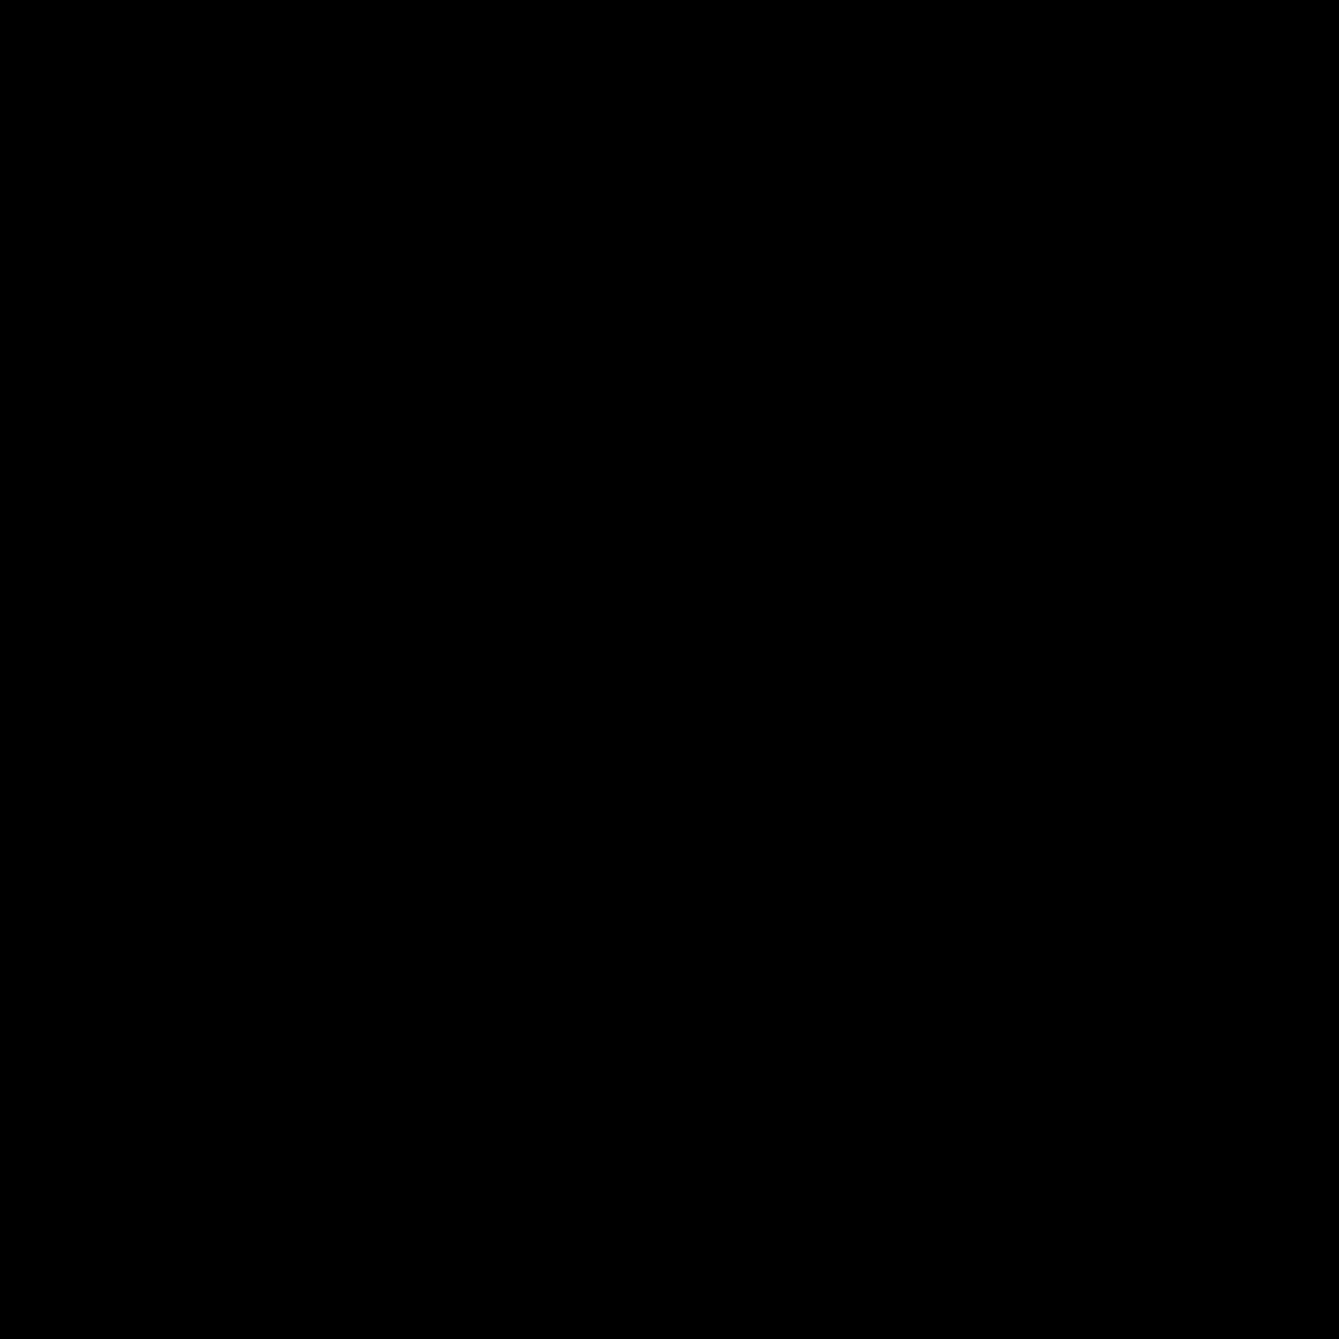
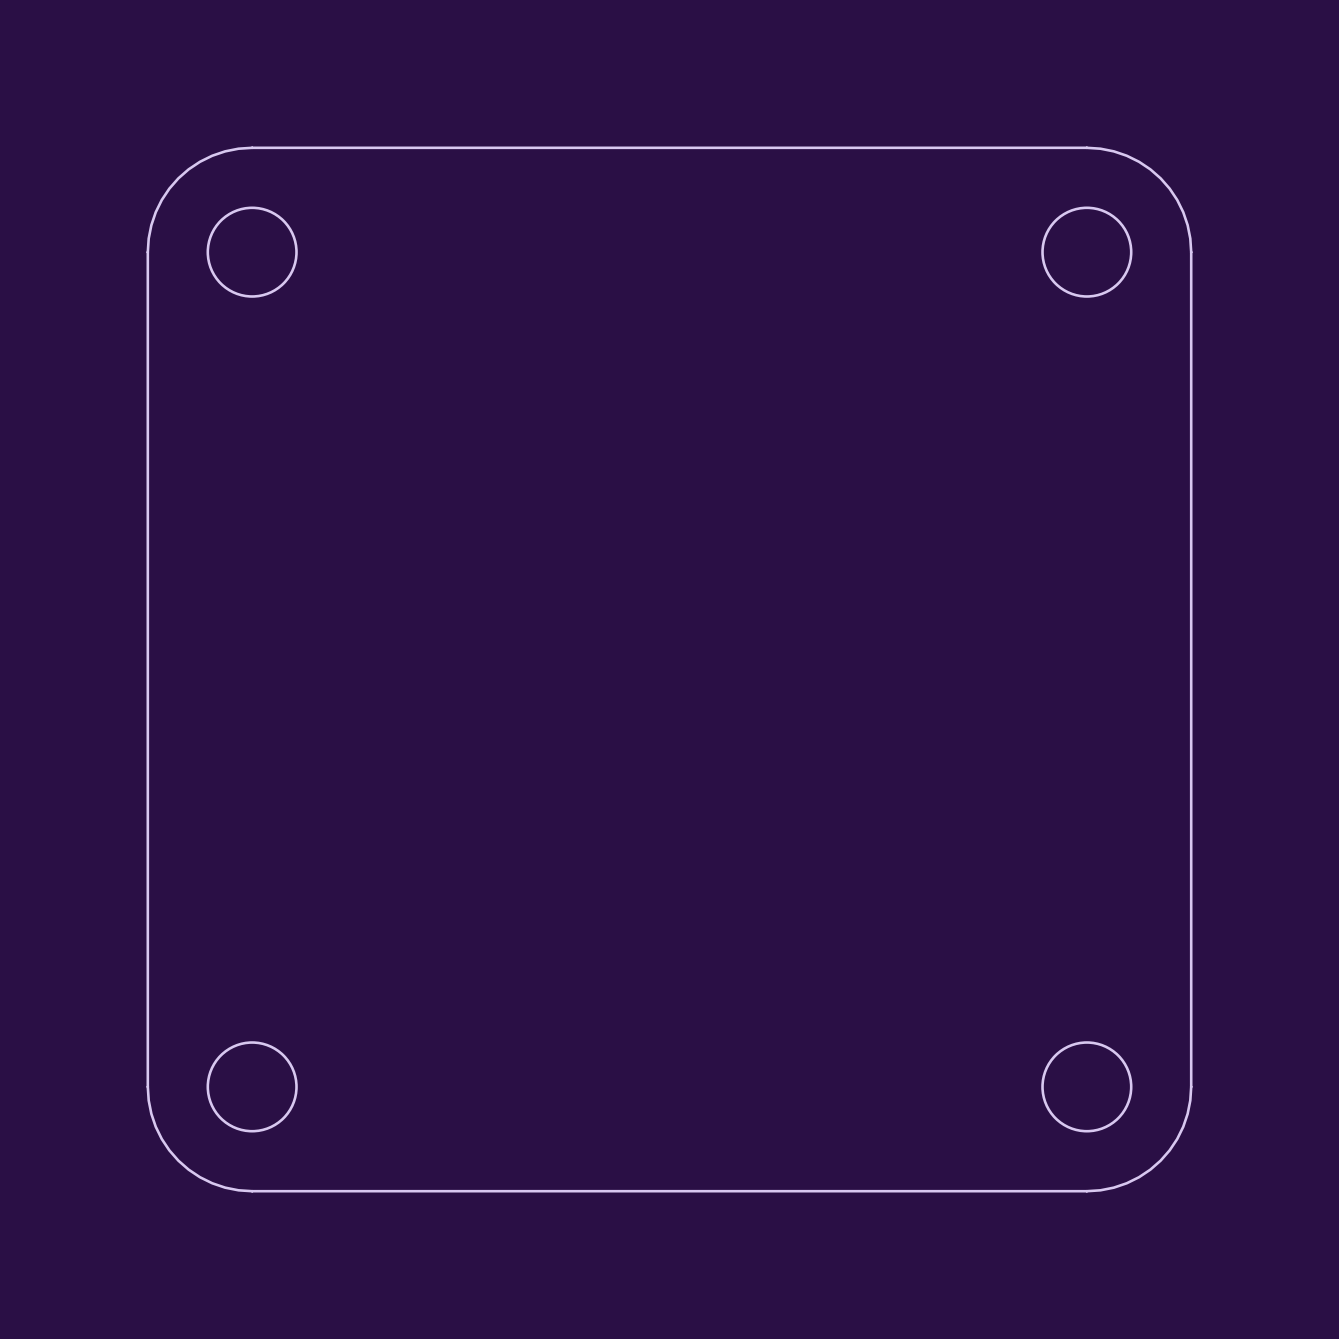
board edge: none -> (1086, 147) (252, 147) (225, 151) (212, 155) (199, 161) (178, 178) (161, 199) (155, 212) (148, 238) (147, 252) (147, 1086) (151, 1113) (155, 1126) (161, 1139) (178, 1160) (188, 1169) (212, 1183) (225, 1187) (252, 1191) (1086, 1191) (1113, 1187) (1126, 1183) (1150, 1169) (1160, 1160) (1169, 1150) (1183, 1126) (1187, 1113) (1191, 1086) (1190, 238) (1183, 212) (1177, 199) (1160, 178) (1150, 169) (1126, 155) (1113, 151) (1086, 147)
round board edge: none -> [206, 206, 298, 298]
round board edge: none -> [1041, 206, 1133, 298]
round board edge: none -> [206, 1041, 298, 1133]
round board edge: none -> [1041, 1041, 1133, 1133]

